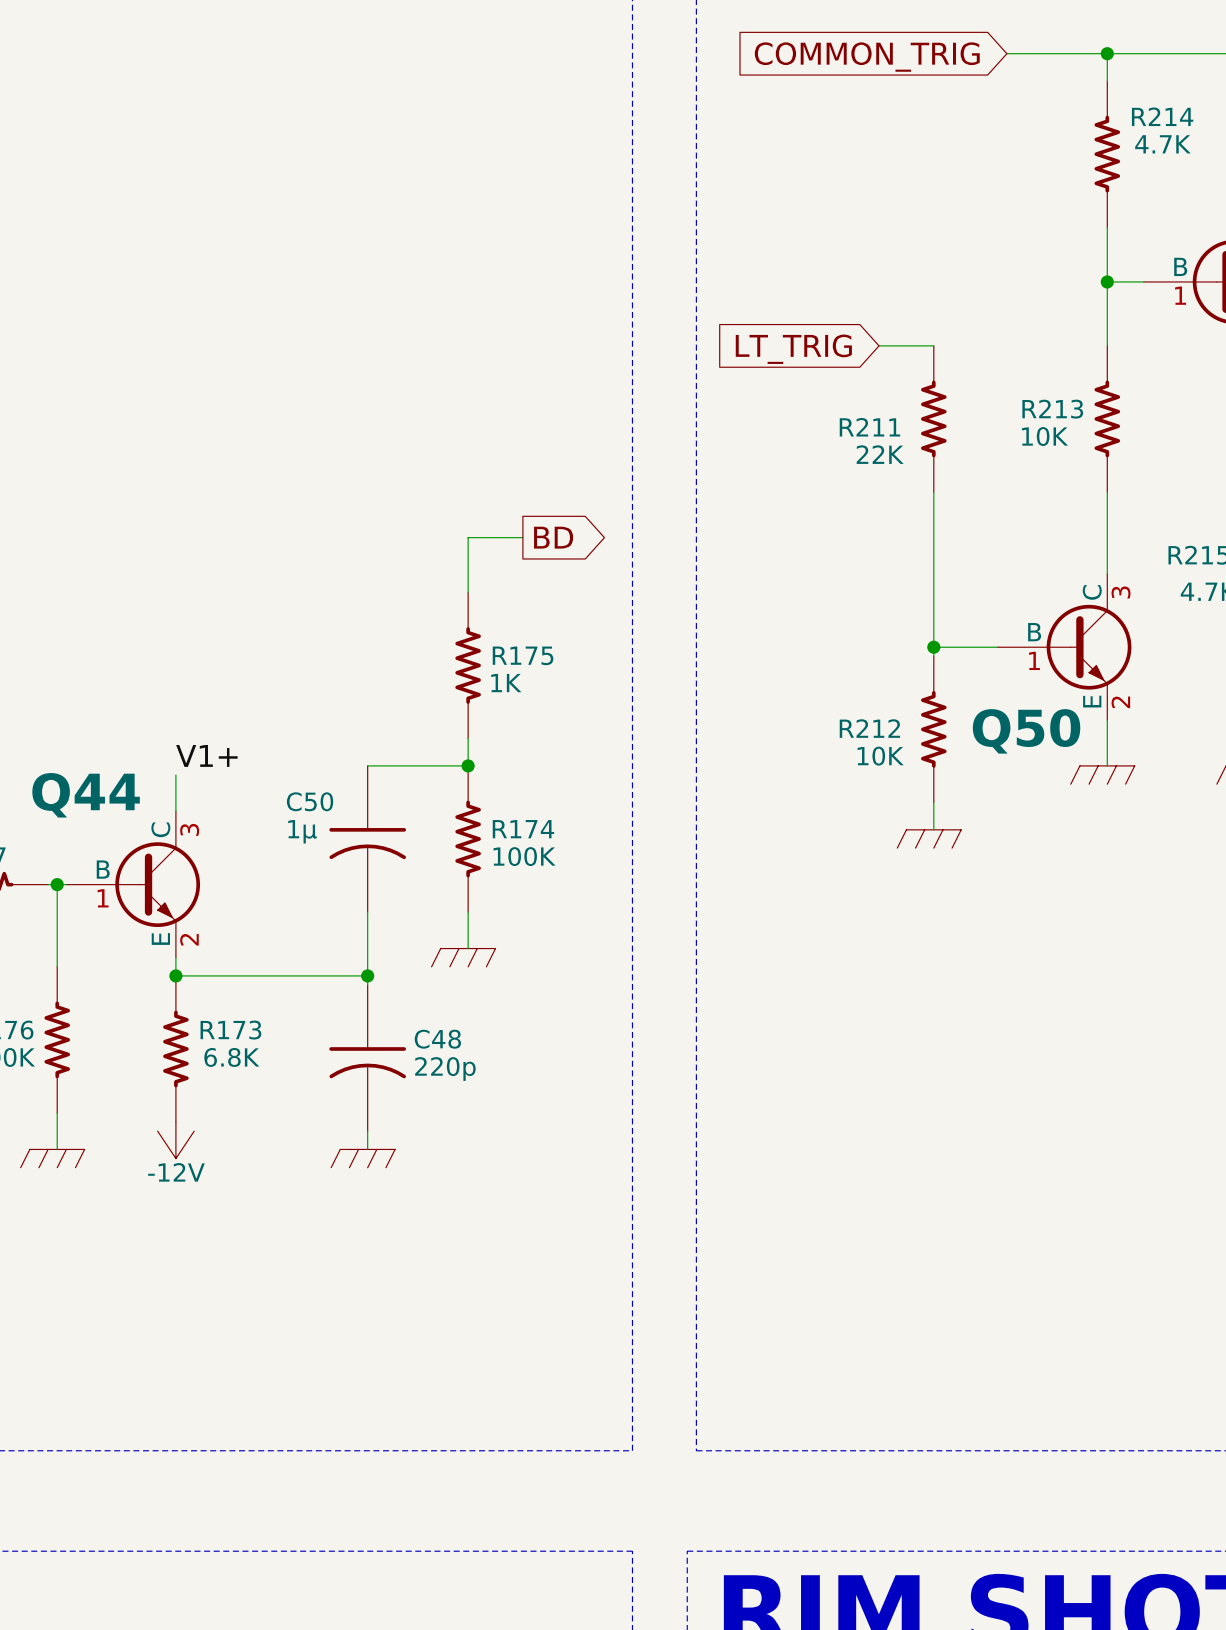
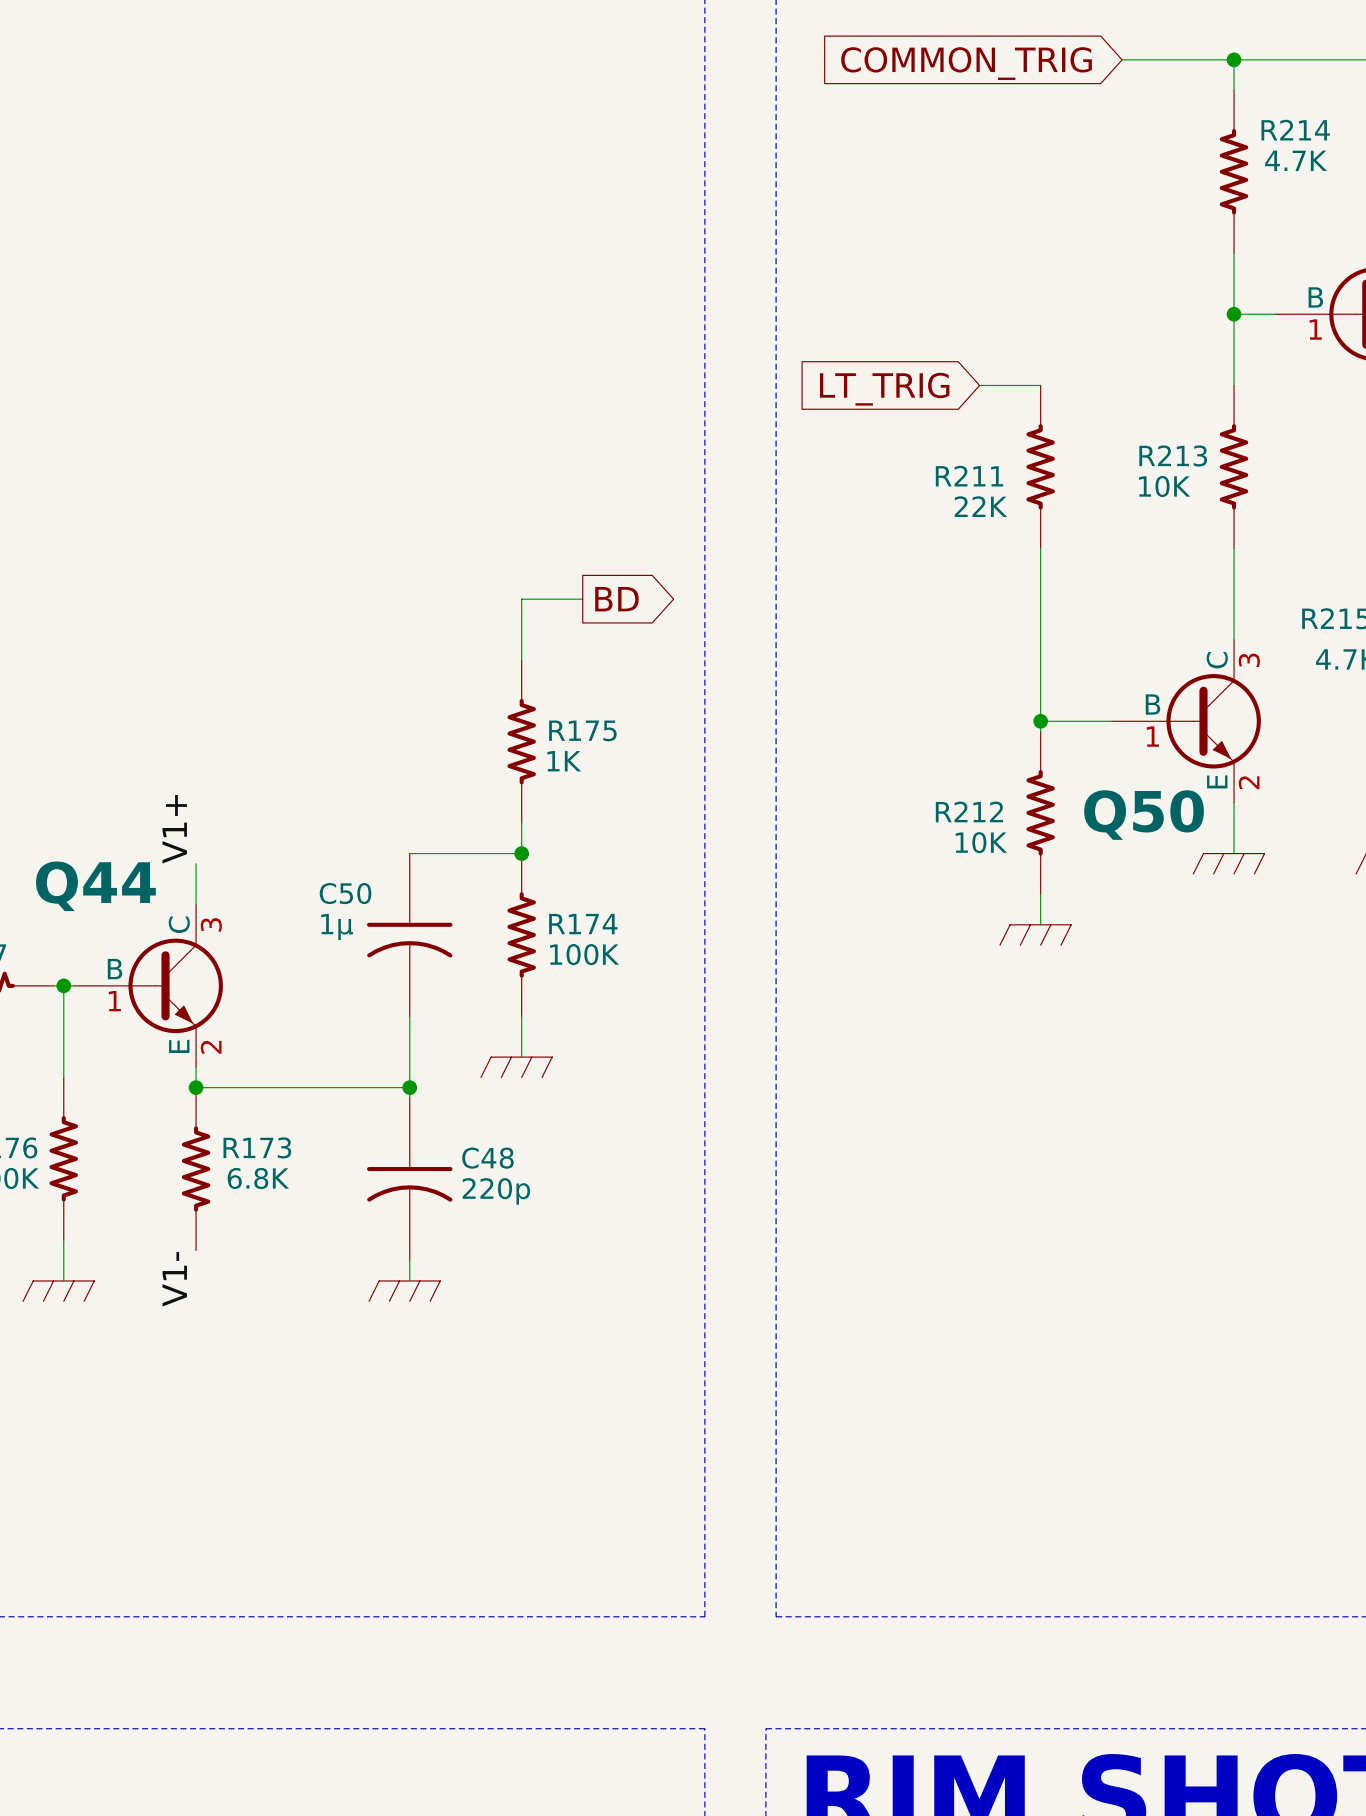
label rotation: 0° (206, 755) -> 90° counterclockwise (174, 829)
power symbol: -12V (175, 1140) -> none
label: none -> V1- (174, 1279)

